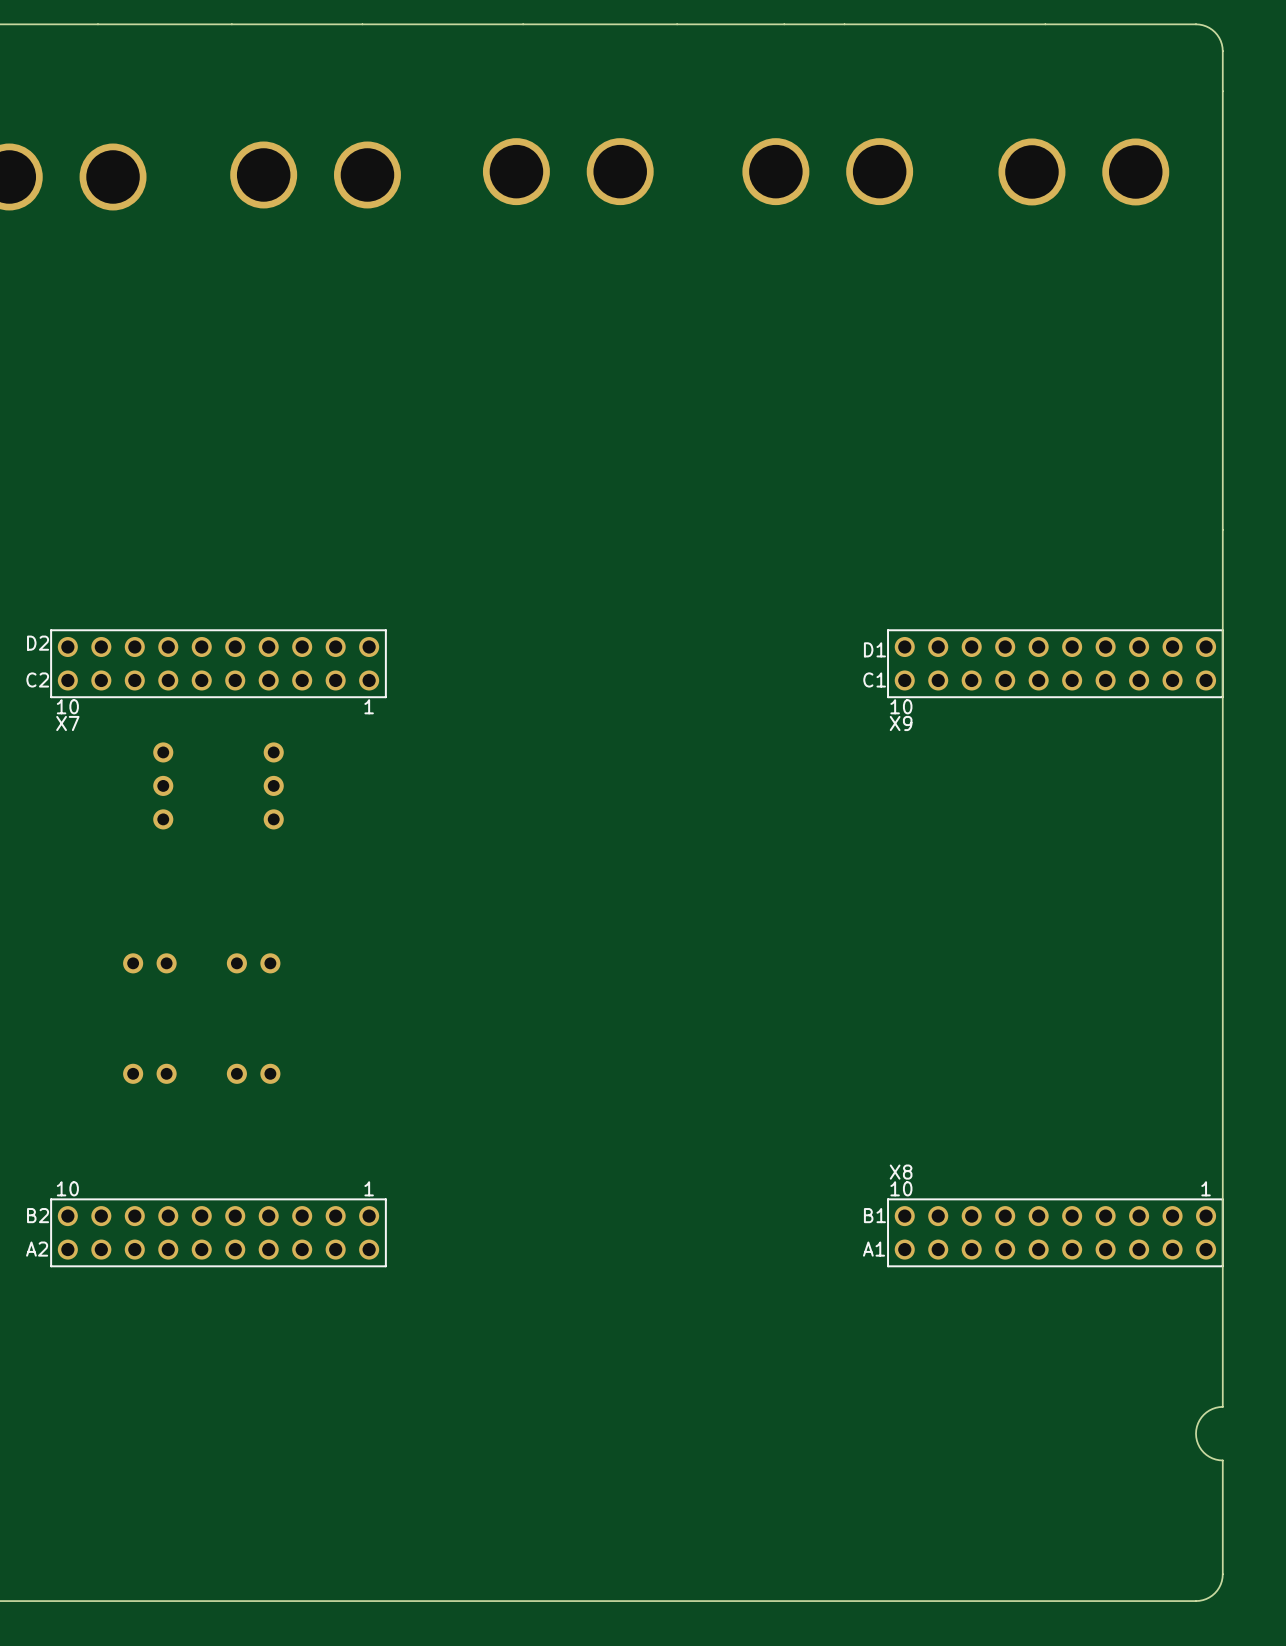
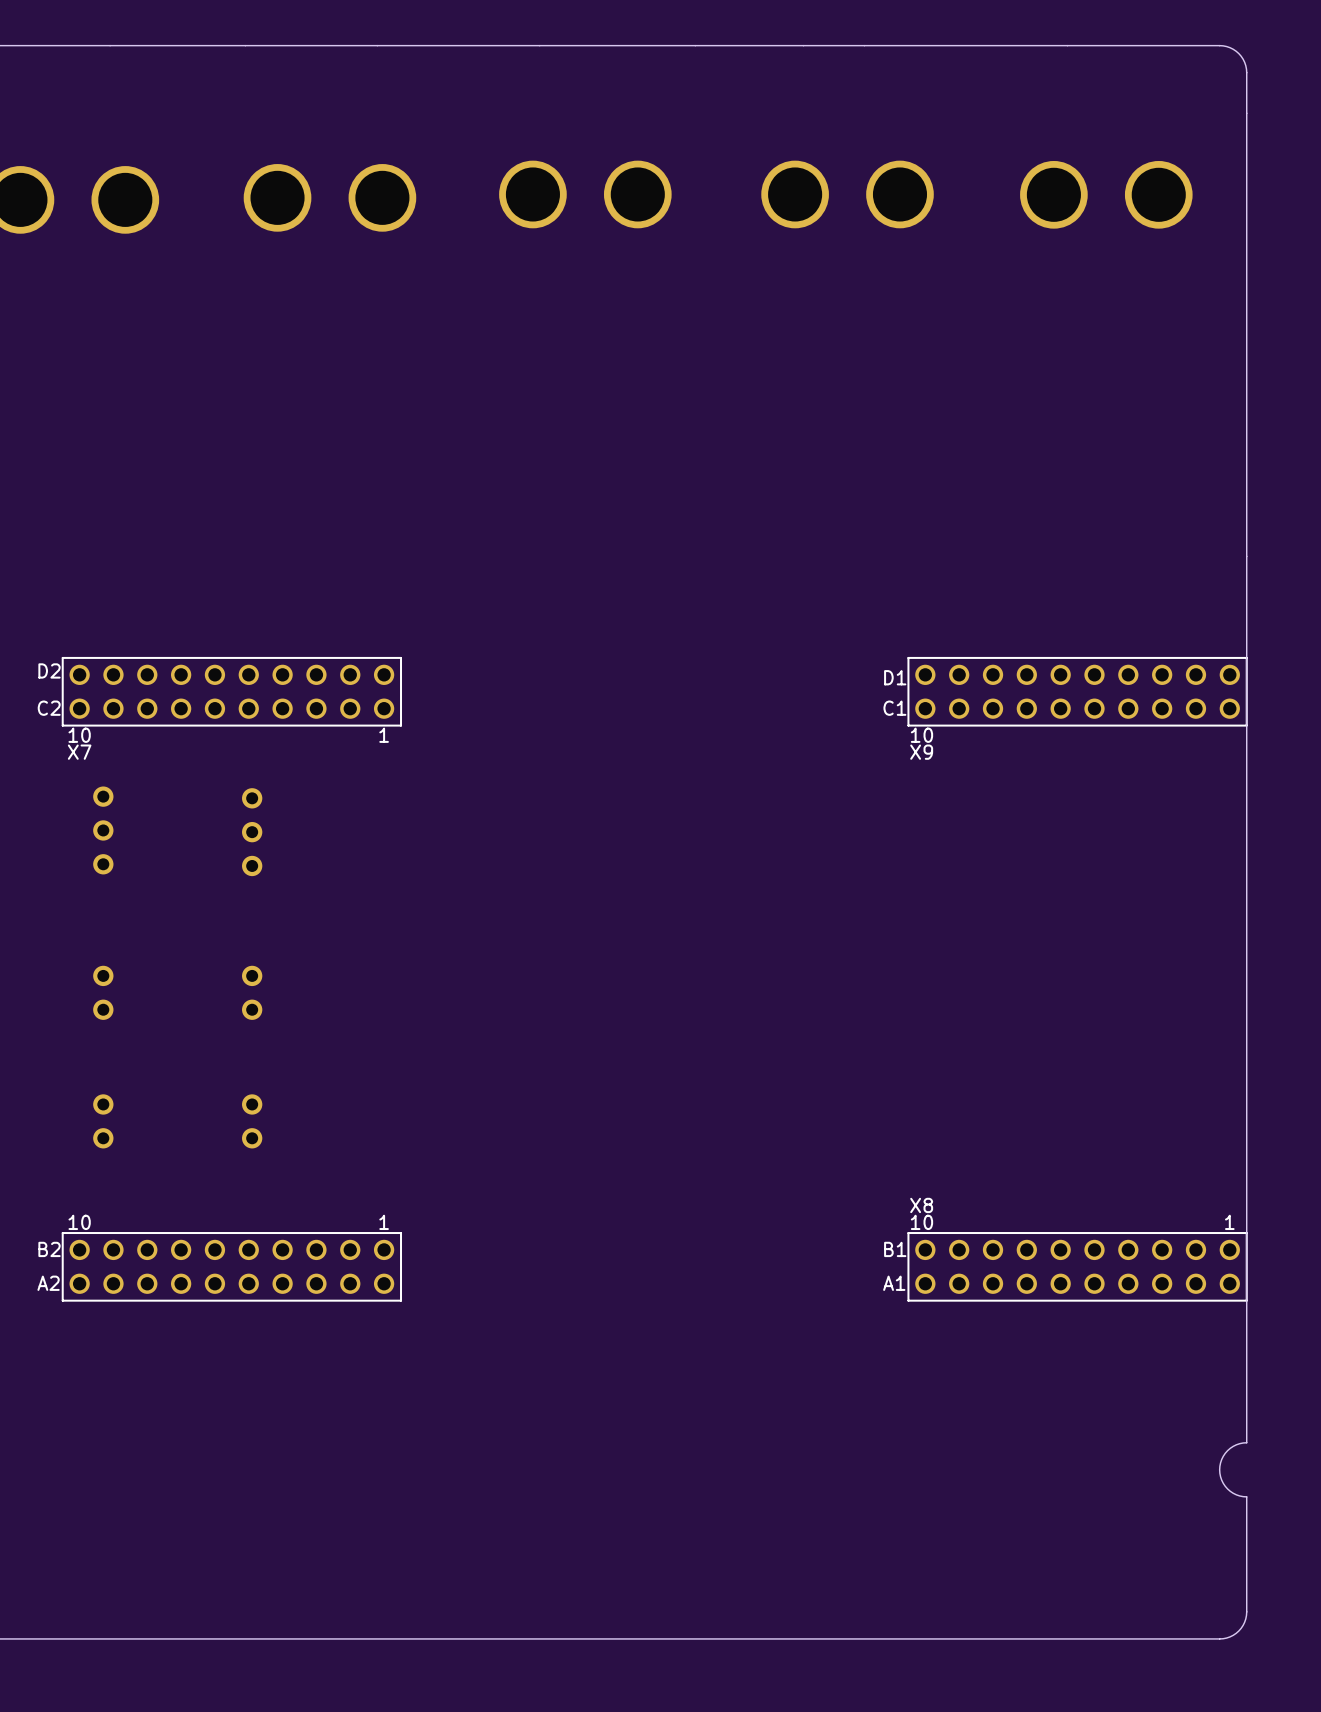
part: (163, 785) -> none
part: (273, 785) -> none
part: none -> (103, 830)
part: none -> (252, 832)
part: none -> (103, 992)
part: (149, 963) -> none
part rotation: 0° (253, 963) -> 90° clockwise (252, 992)
part: (149, 1073) -> none
part rotation: 0° (253, 1073) -> 90° clockwise (252, 1121)
part: none -> (103, 1121)

